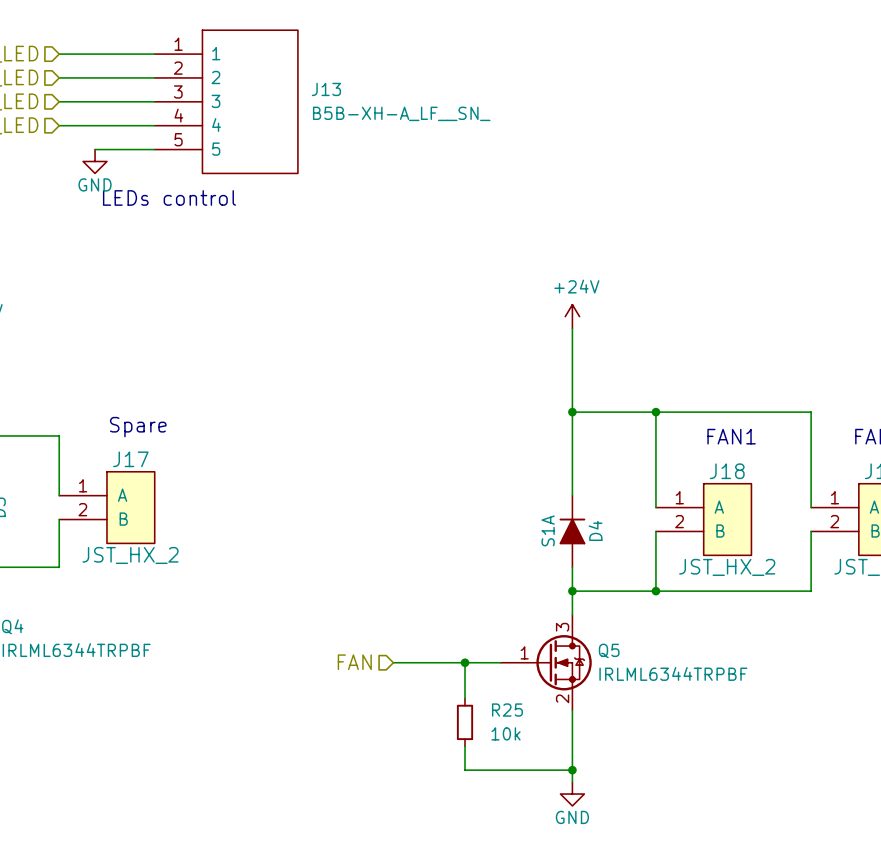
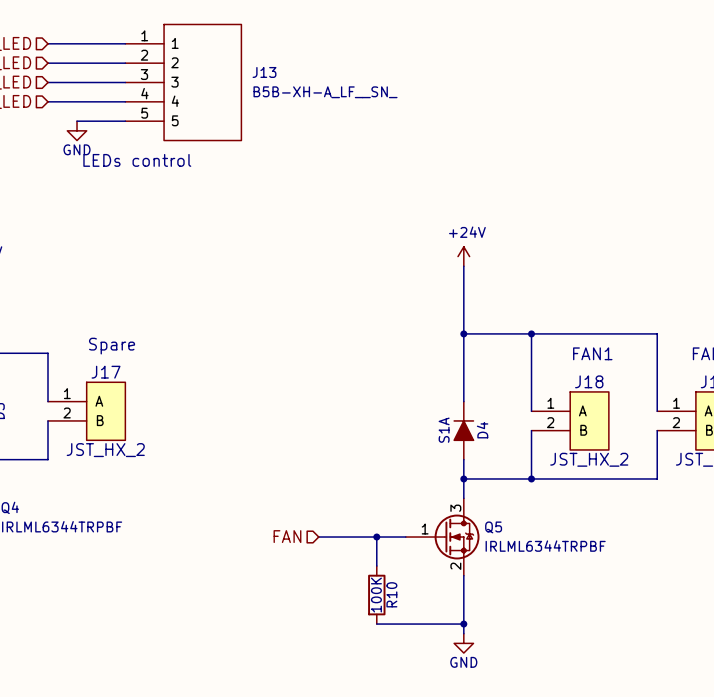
R25: 10k (465, 722) -> none
R10: none -> 100K (376, 595)

